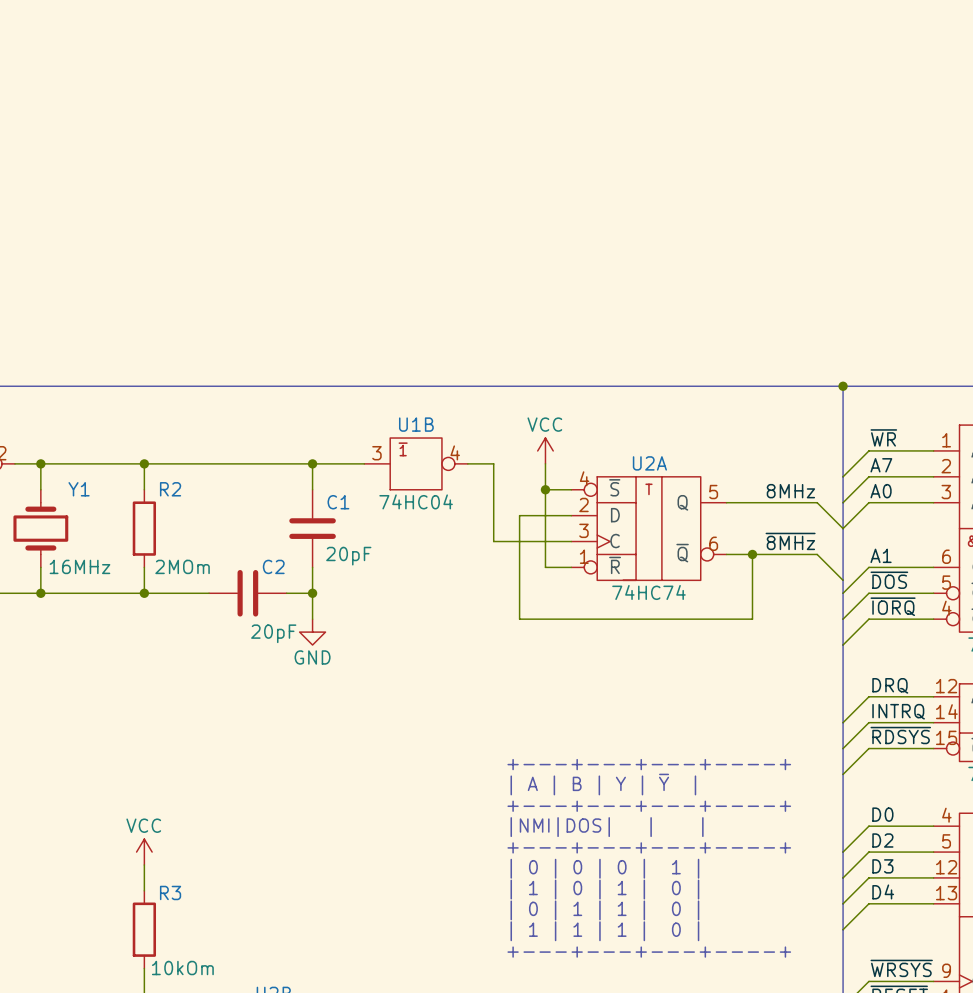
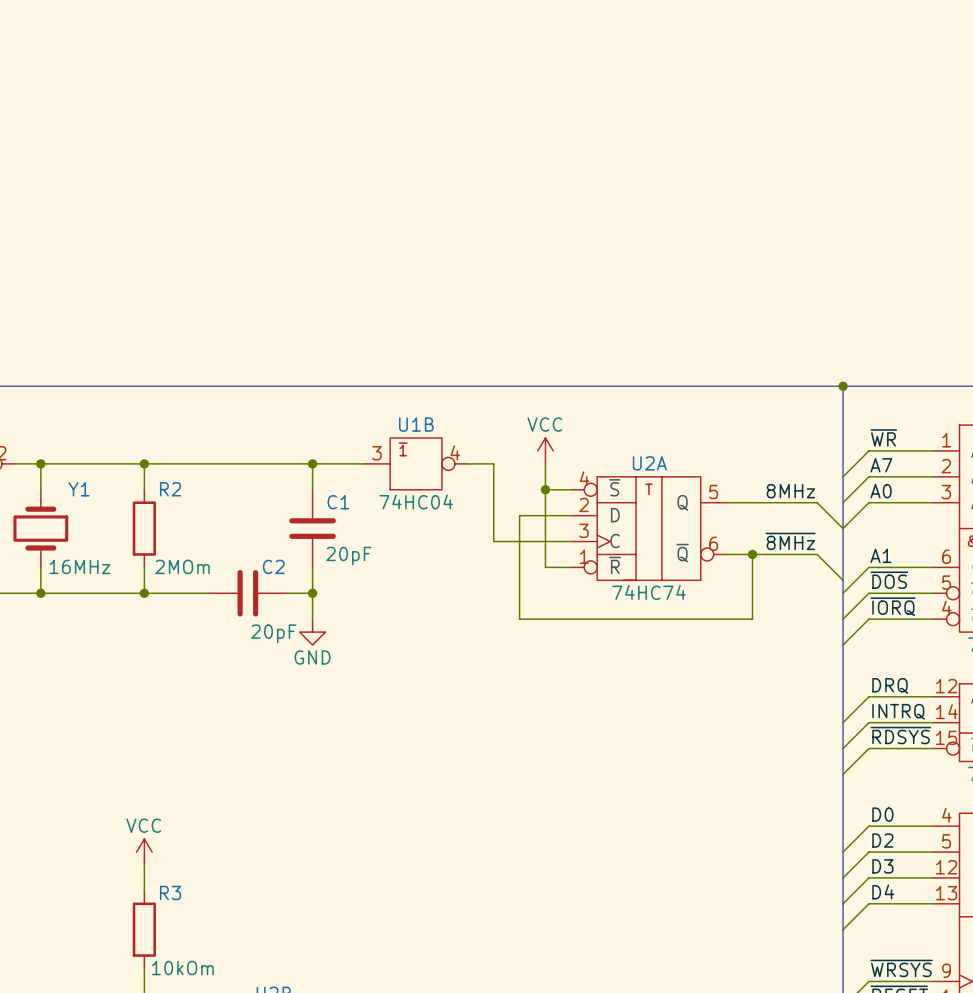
text: +---+---+---+----+ (649, 764) -> none
text: | A | B | Y | ~{Y} | (603, 784) -> none
text: +---+---+---+----+ (649, 806) -> none
text: |NMI|DOS| | | (607, 827) -> none
text: +---+---+---+----+ (649, 847) -> none
text: | 0 | 0 | 0 | 1 | (604, 868) -> none
text: | 1 | 0 | 1 | 0 | (604, 889) -> none
text: | 0 | 1 | 1 | 0 | (604, 910) -> none
text: | 1 | 1 | 1 | 0 | (604, 931) -> none
text: +---+---+---+----+ (649, 952) -> none

